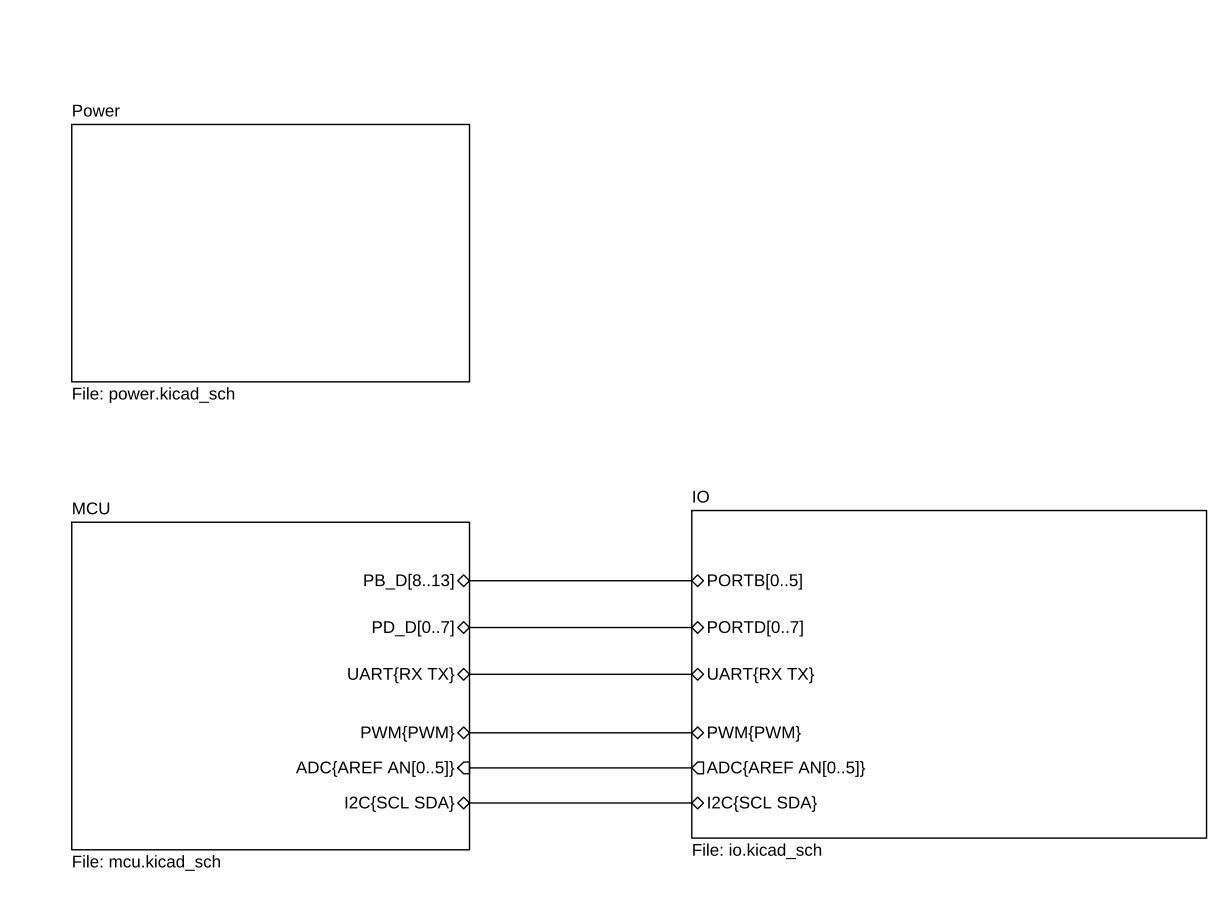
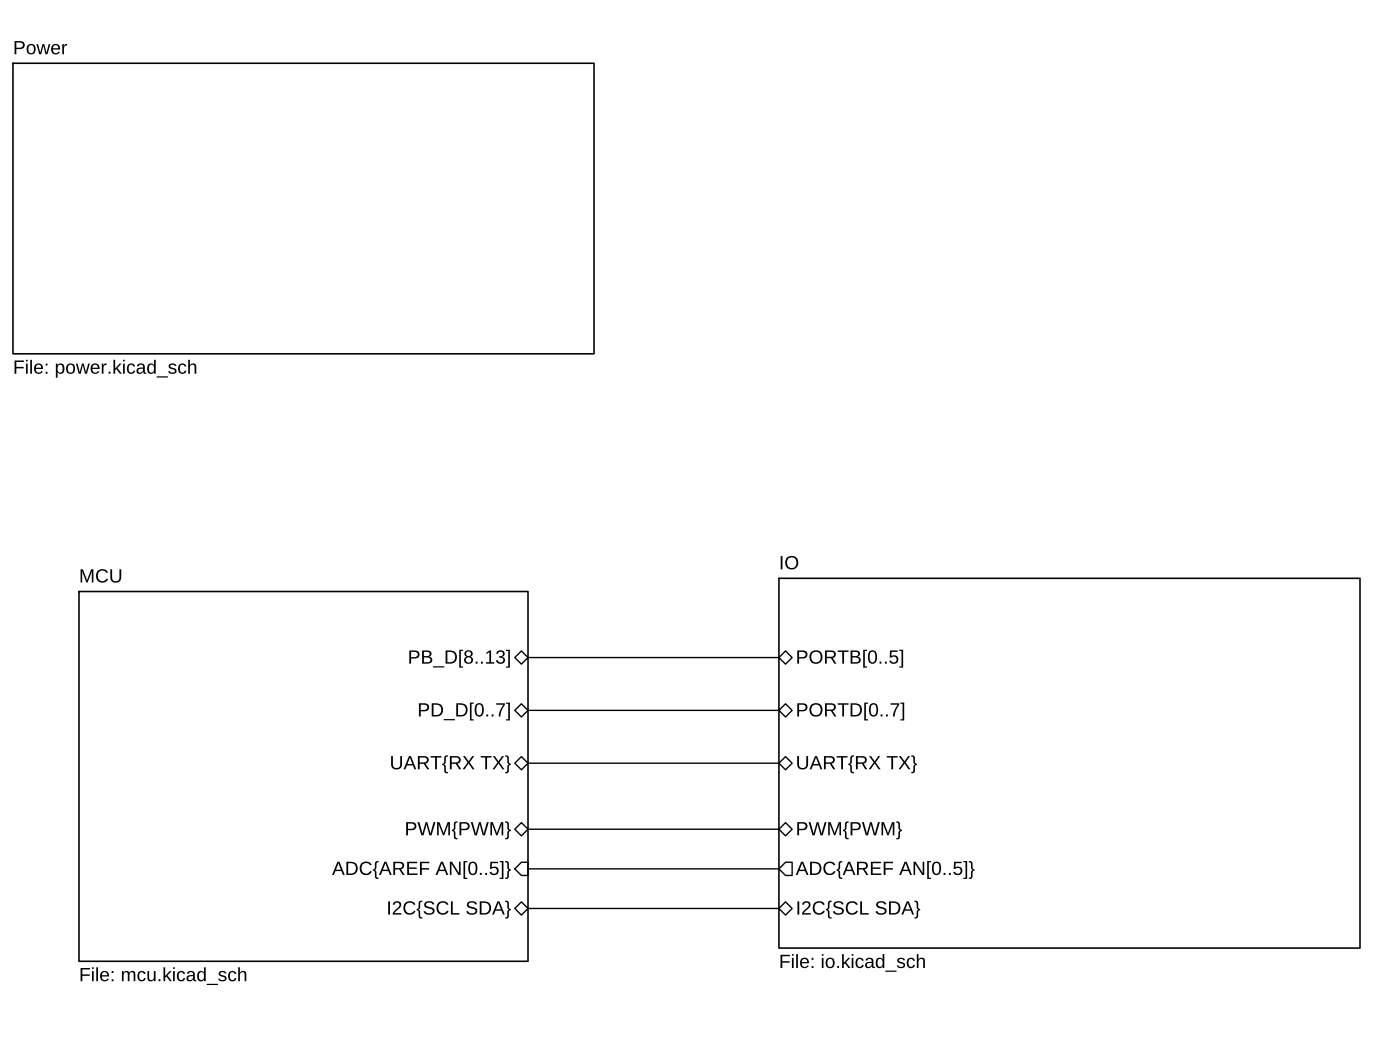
sheet Power: none -> File: power.kicad_sch (303, 208)
sheet Power: File: power.kicad_sch (270, 253) -> none

